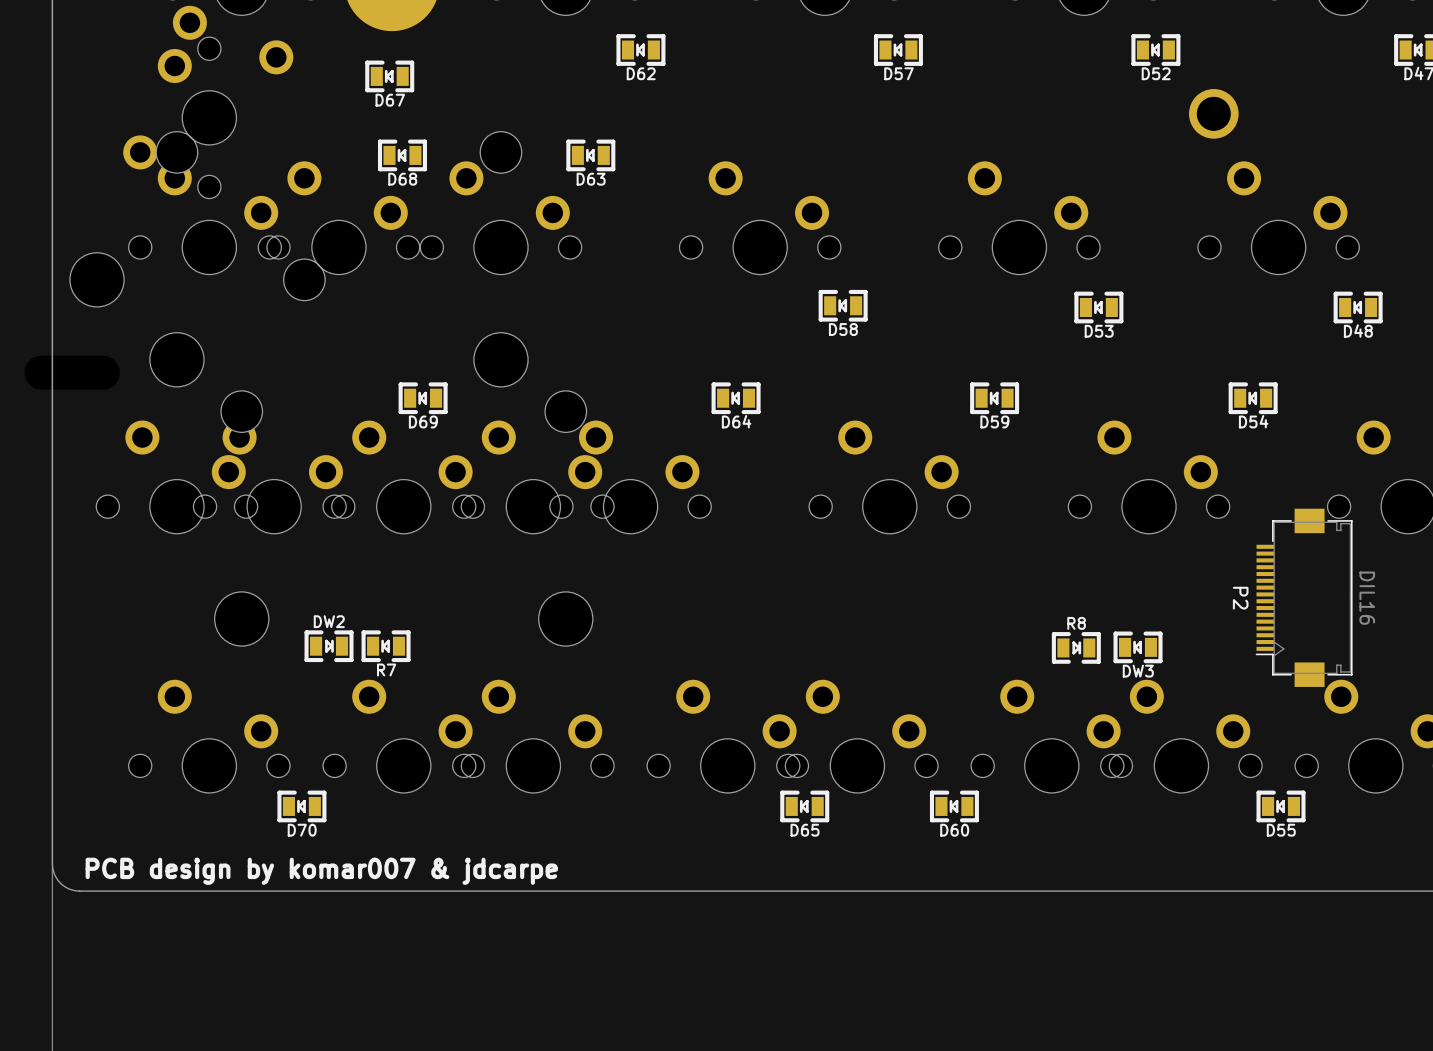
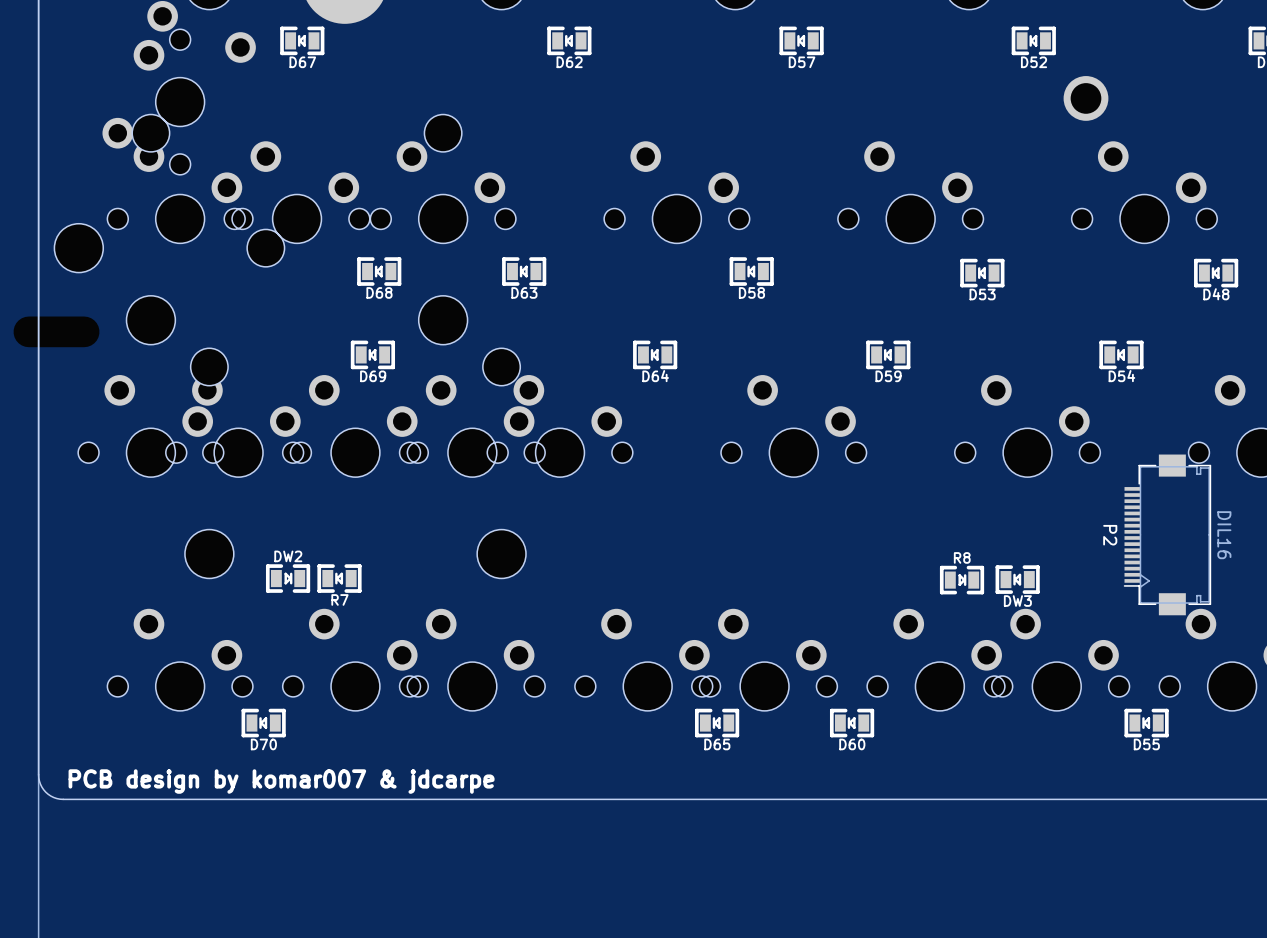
D67 position: (389, 76) -> (302, 40)
D68 position: (402, 155) -> (379, 271)
D63 position: (590, 155) -> (524, 271)

